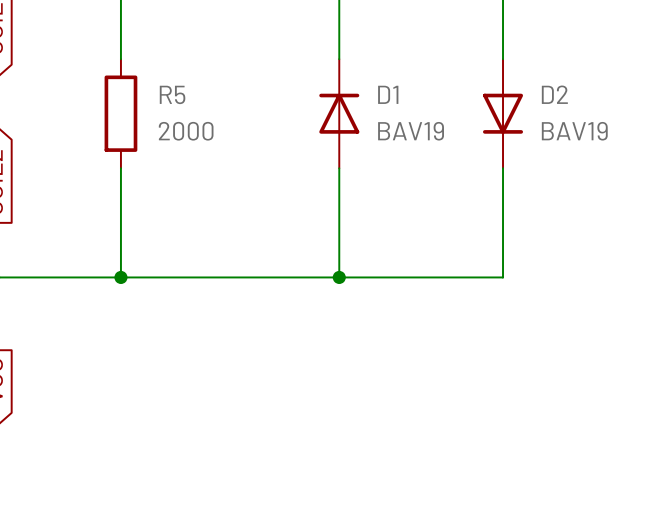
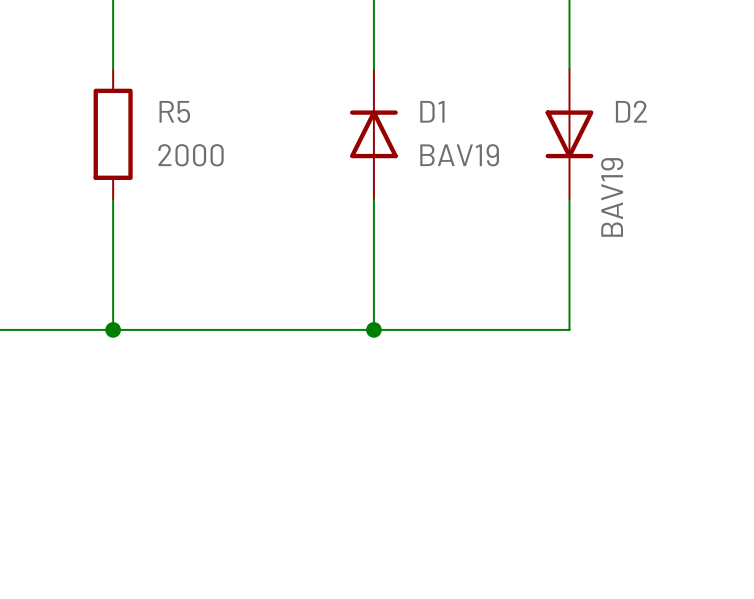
D2 value rotation: 0° (574, 131) -> 90° counterclockwise (612, 197)

